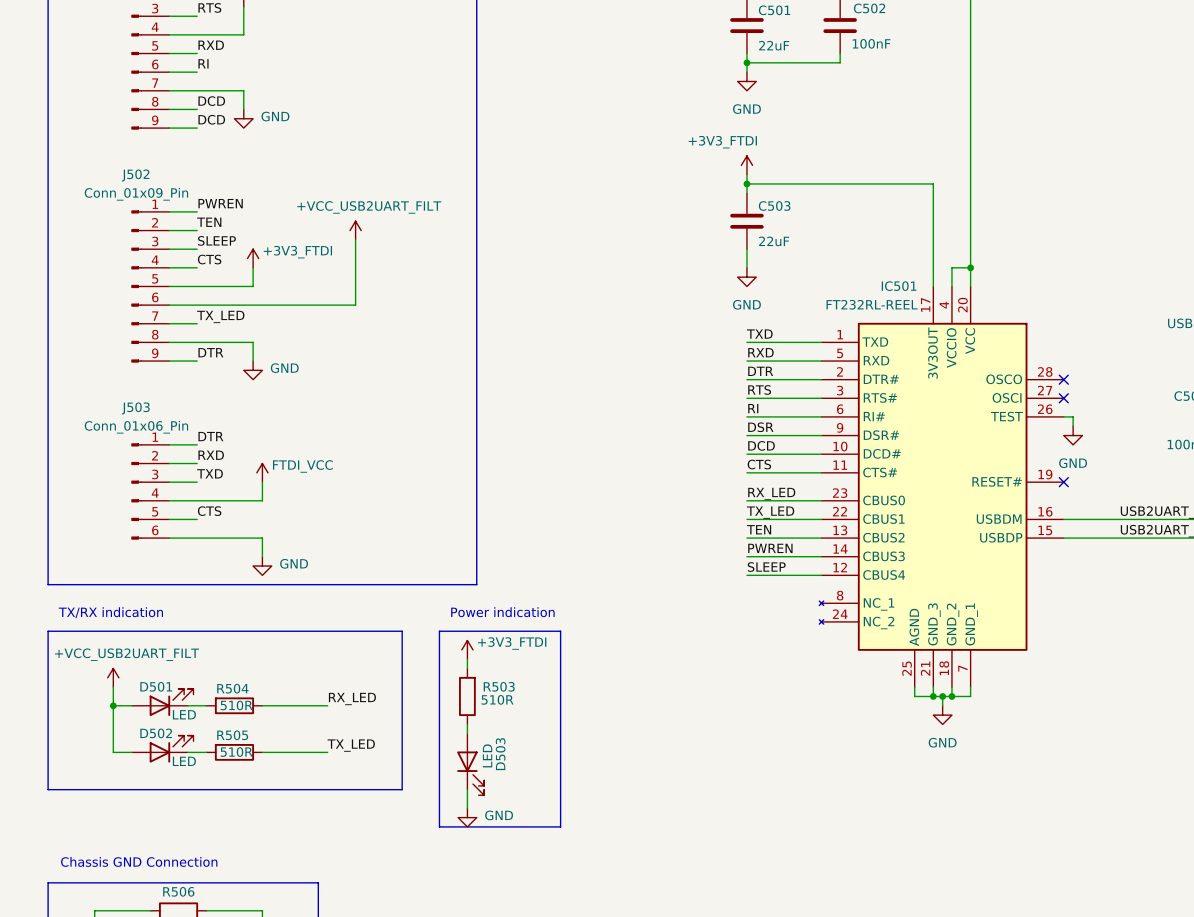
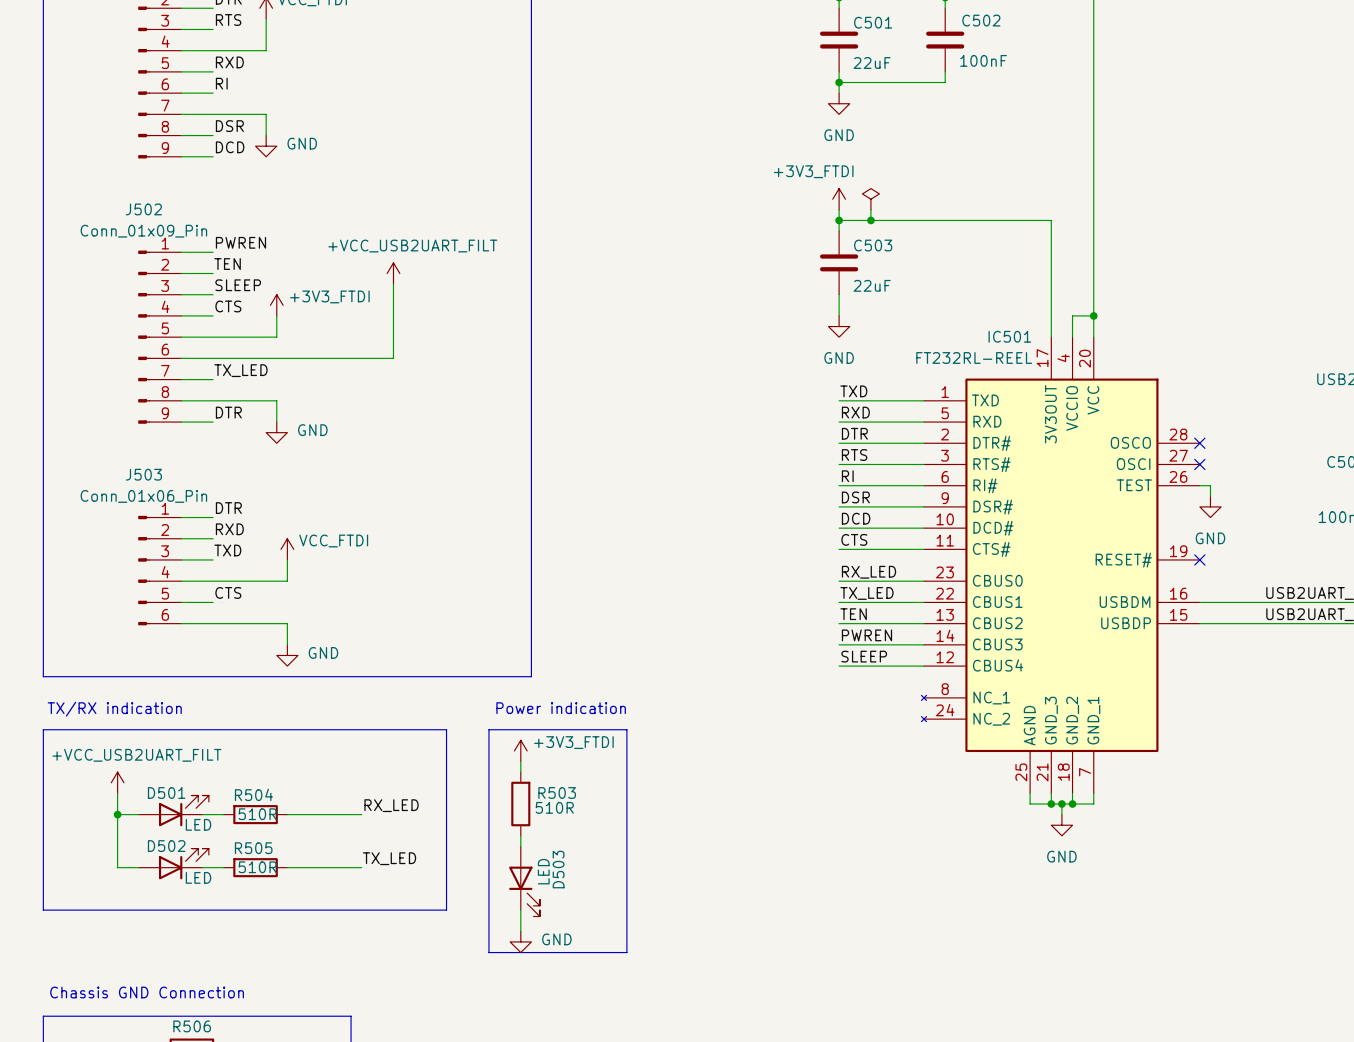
label: DCD (211, 101) -> DSR (229, 126)
power symbol: none -> (870, 199)
wire: none -> (870, 209) (870, 220)
junction: none -> (870, 220)
power symbol: FTDI_VCC (262, 472) -> VCC_FTDI (287, 549)

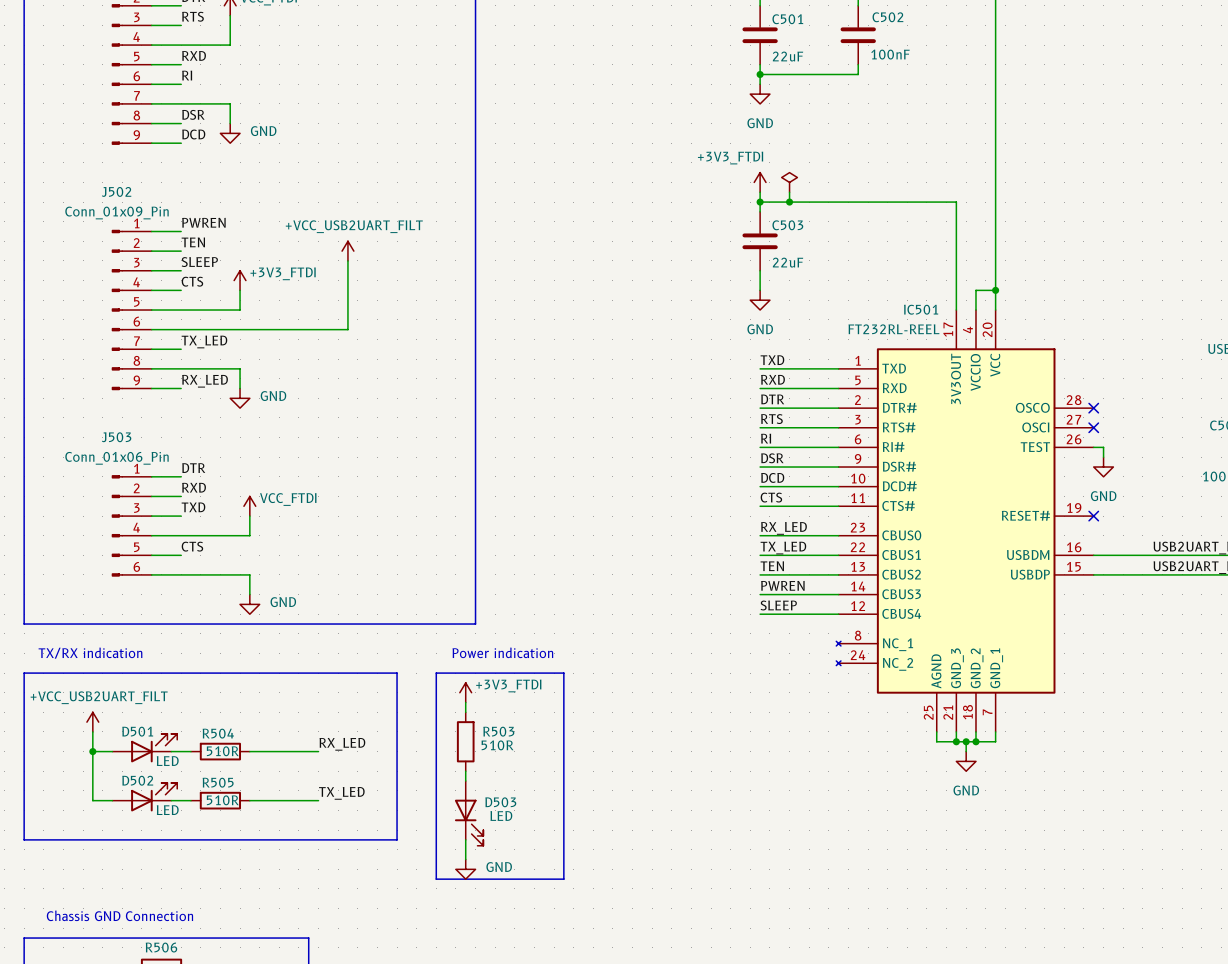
label: DTR (228, 412) -> RX_LED (205, 381)
D503 name rotation: 0° (558, 869) -> 90° clockwise (500, 802)
D503 value rotation: 0° (543, 871) -> 90° clockwise (501, 815)

